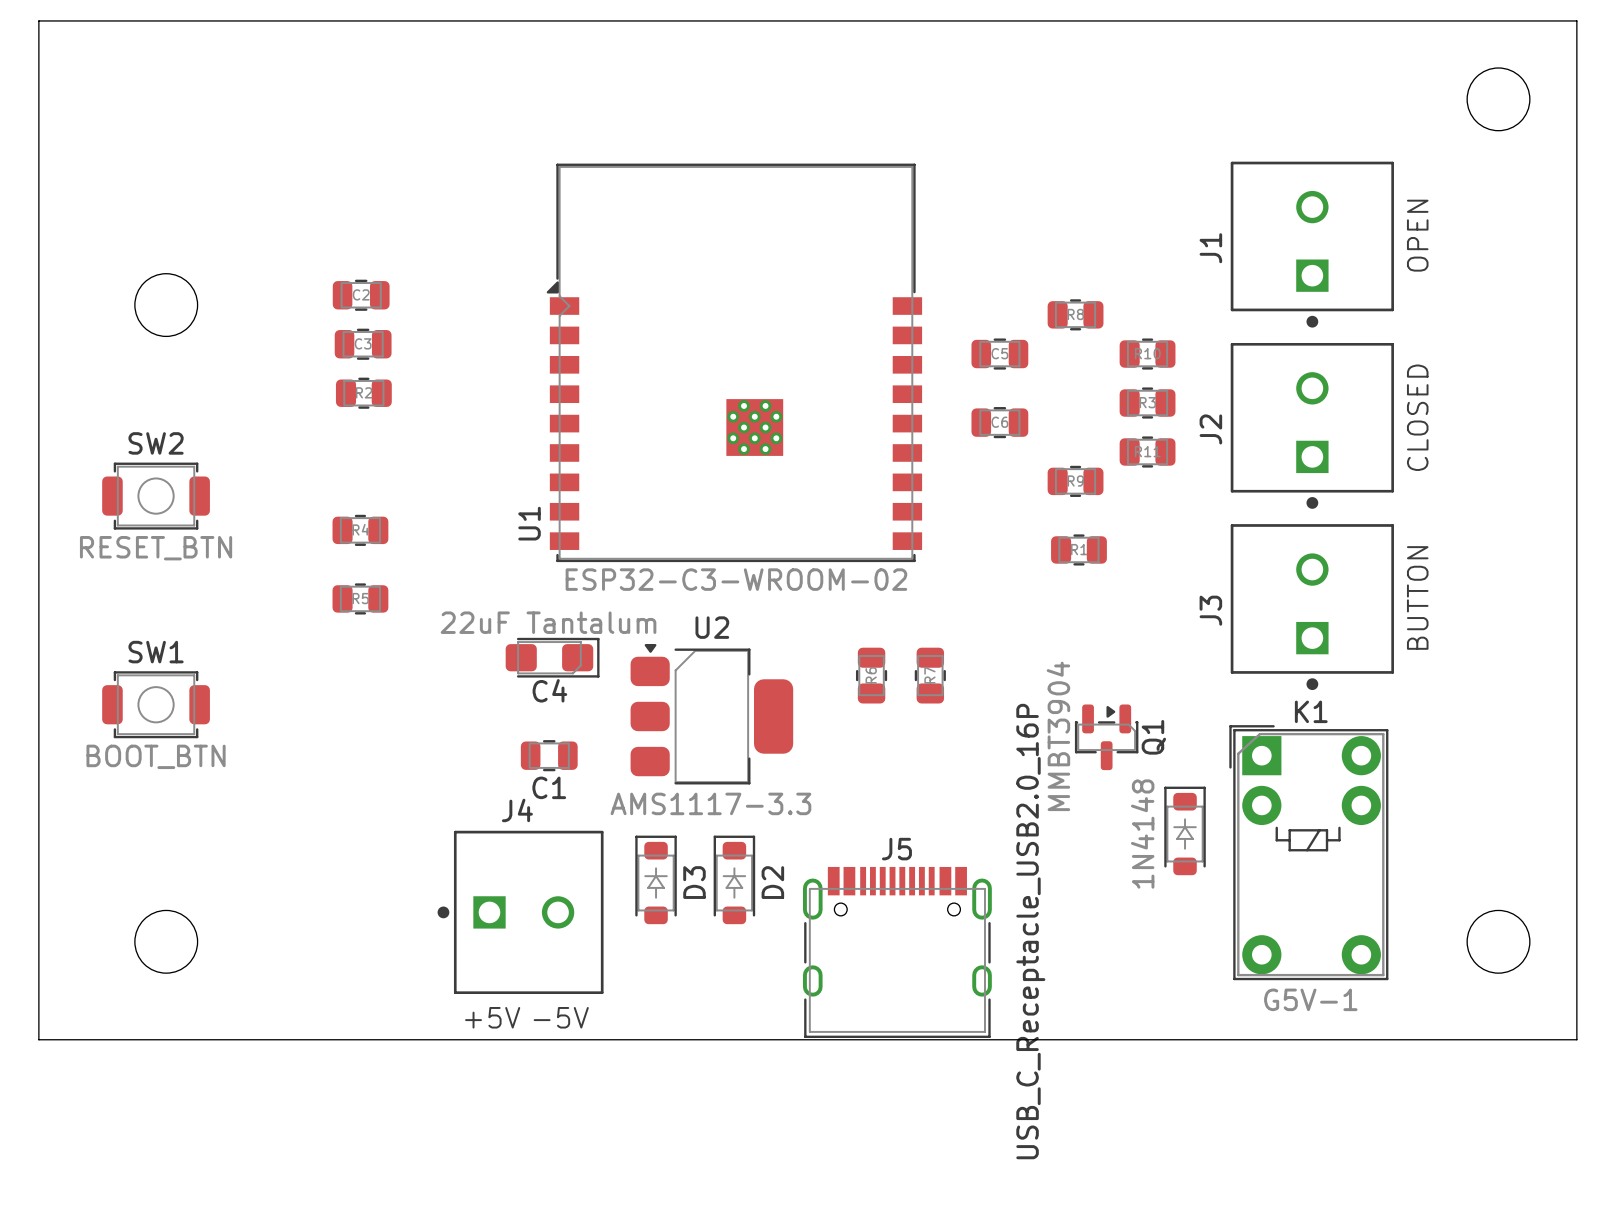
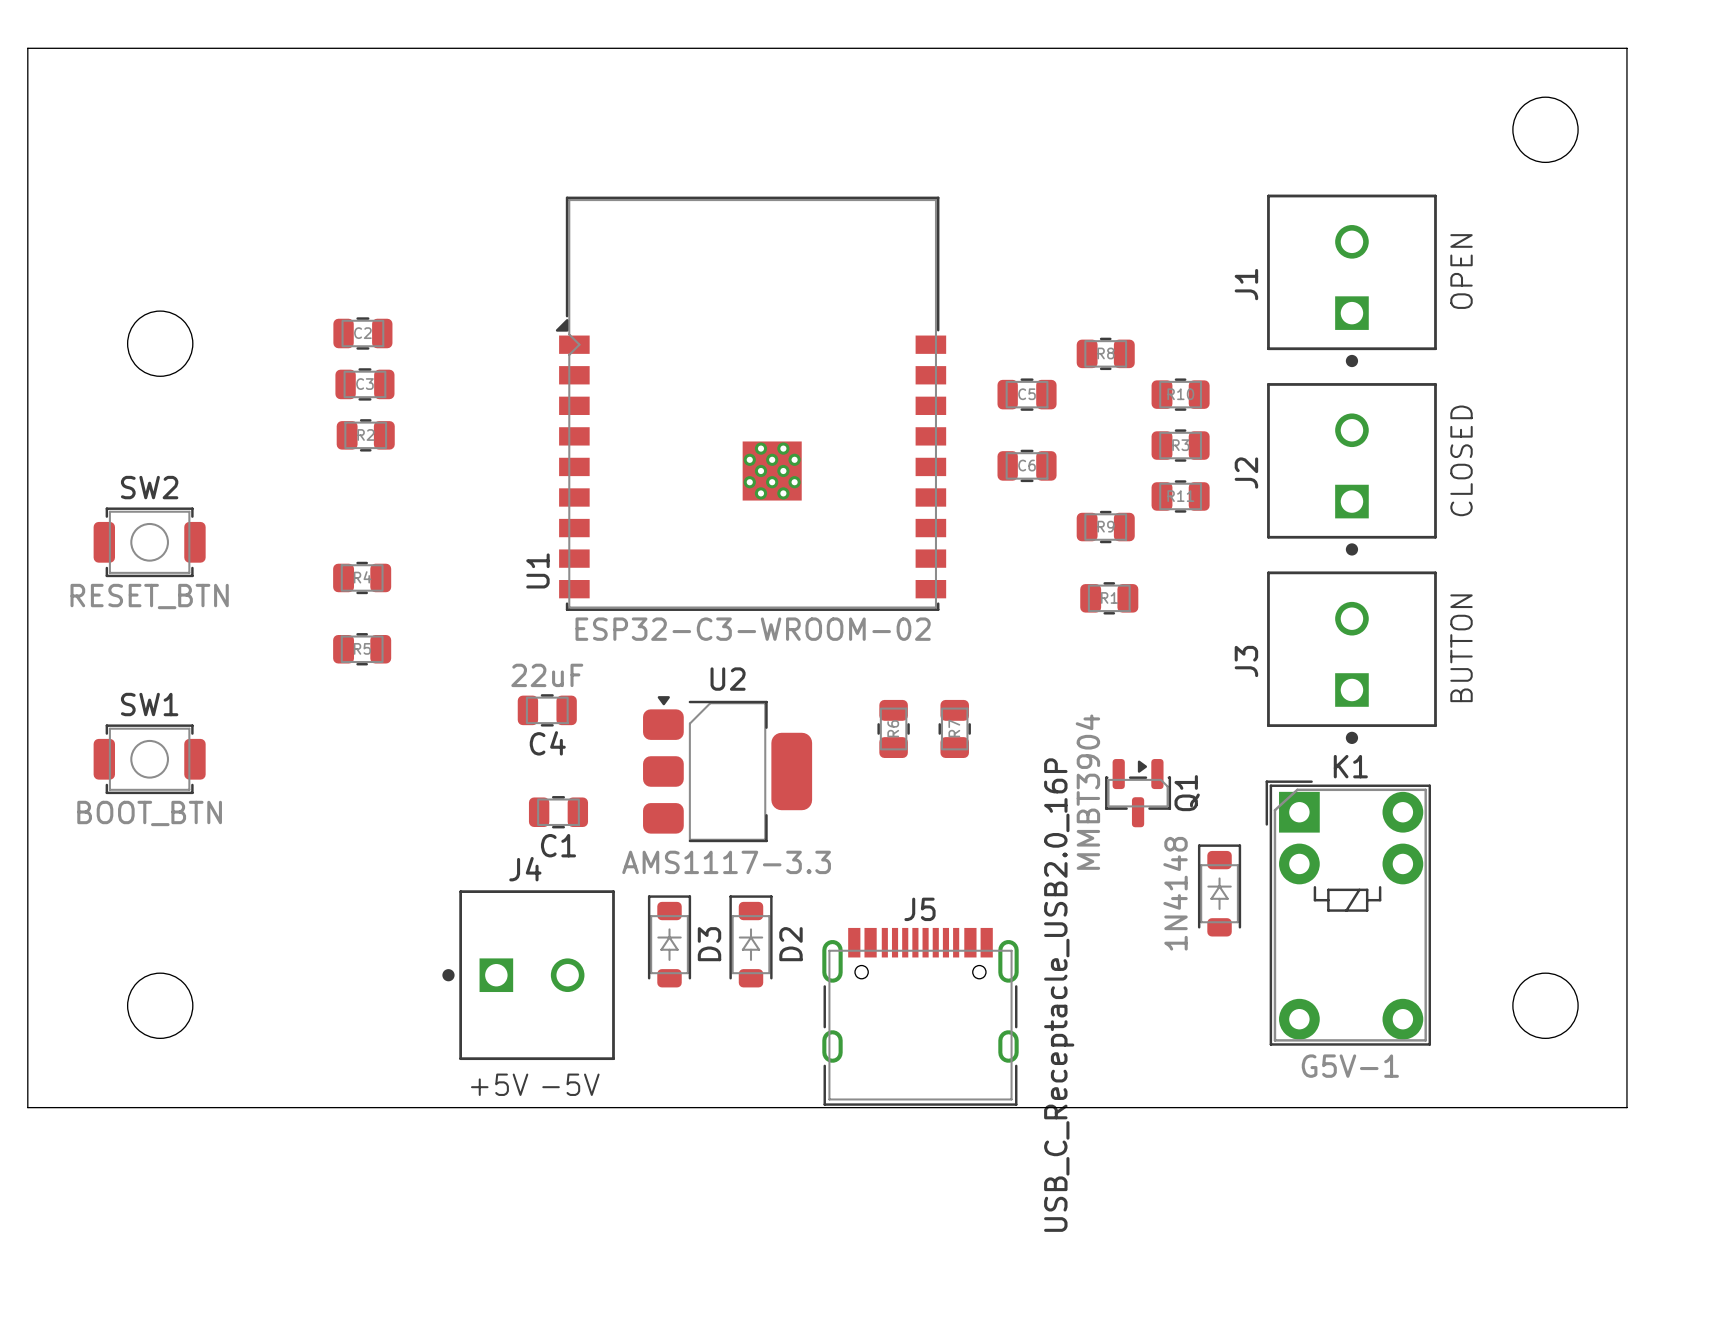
C4 value: 22uF Tantalum (548, 622) -> 22uF (547, 675)
C4 footprint: [505, 637, 600, 678] -> [517, 694, 577, 727]

